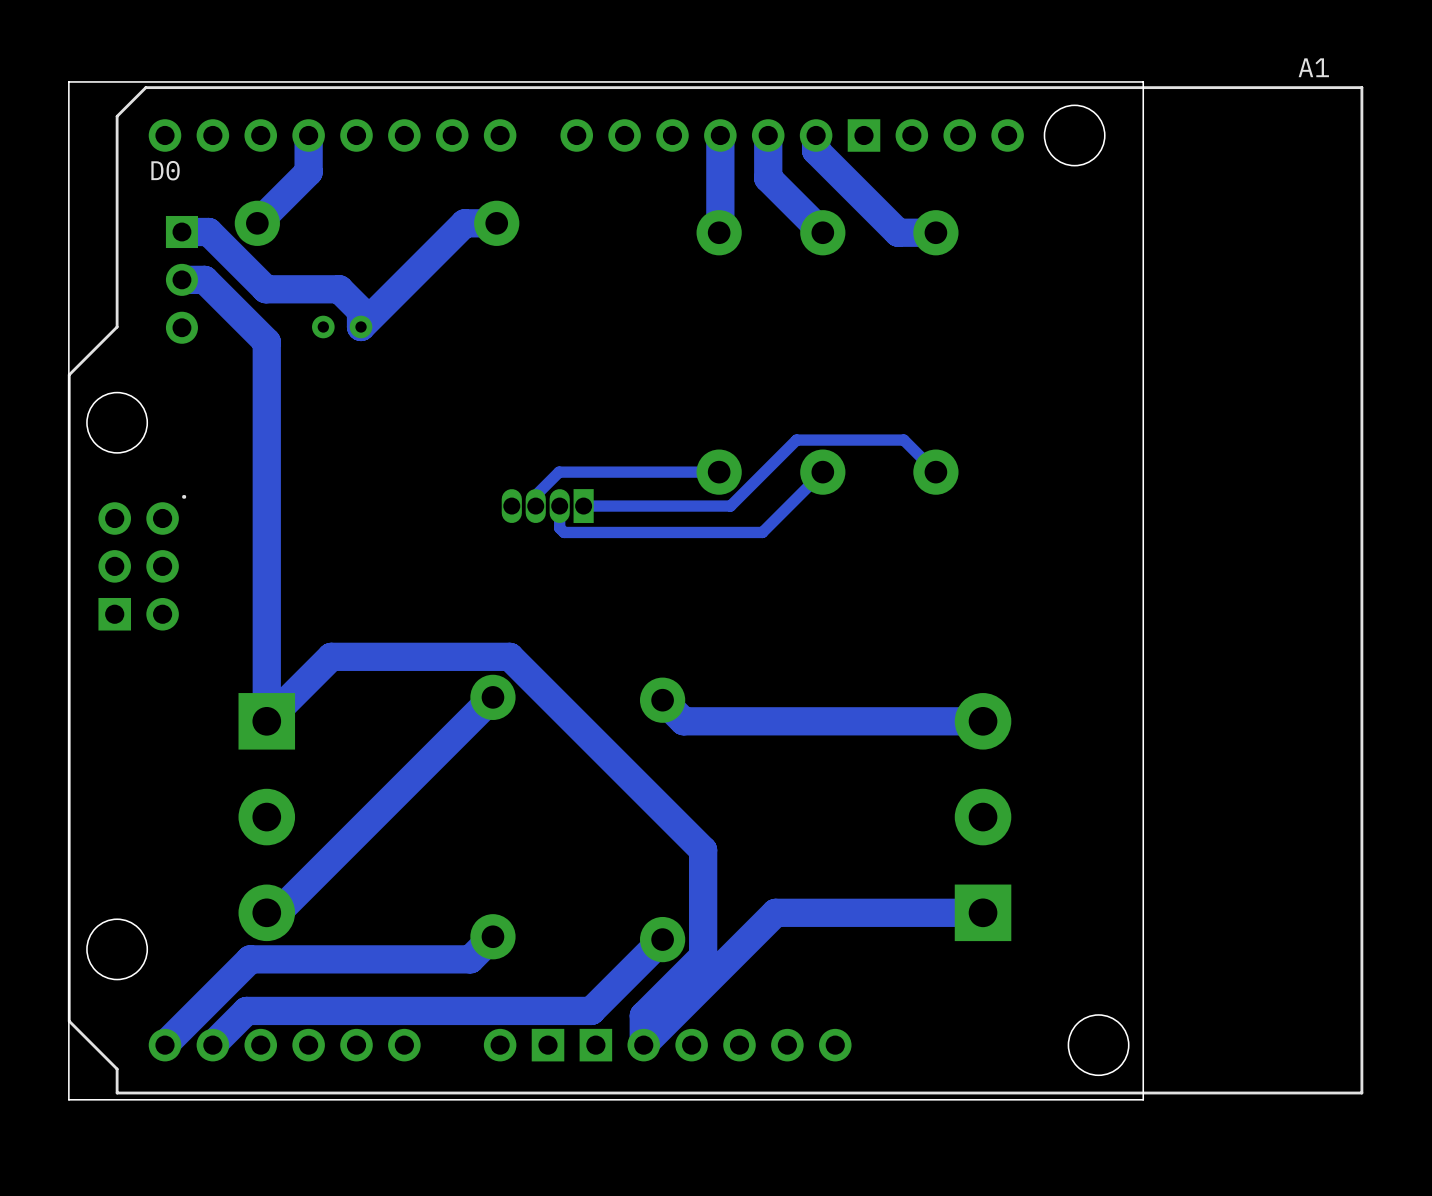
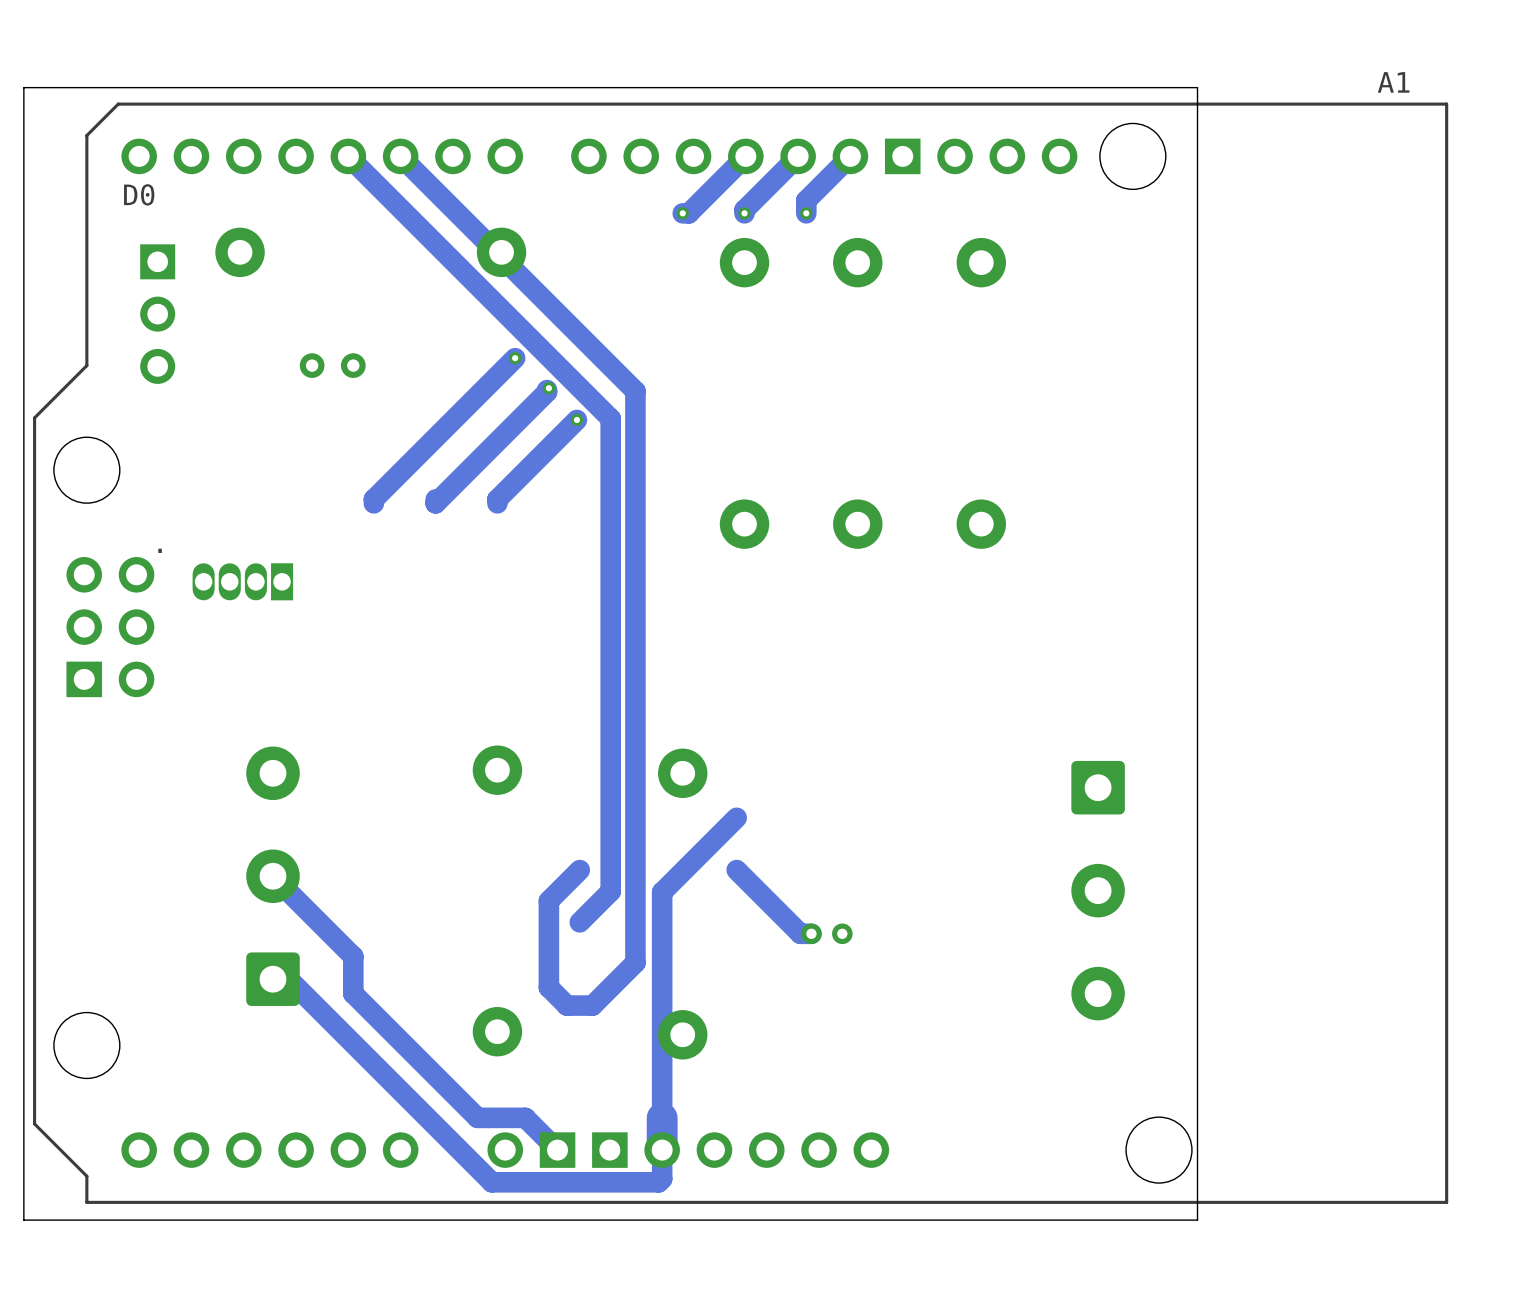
board edge: (1143, 81) (68, 81) (68, 1099) (1143, 1099) (1143, 81) -> (1197, 87) (1197, 1220) (23, 1220) (23, 87) (1197, 87)
track: (308, 135) (308, 172) (257, 223) -> none
track: none -> (348, 156) (610, 418) (610, 891) (579, 922)
track: none -> (400, 156) (635, 391) (635, 962) (592, 1005) (566, 1005) (548, 987) (548, 900) (579, 870)
track: (720, 135) (719, 232) -> (745, 156) (688, 213) (682, 213)
track: (768, 135) (768, 178) (822, 232) -> (798, 156) (744, 210) (744, 213)
track: (816, 135) (816, 150) (898, 232) (935, 232) -> (850, 156) (806, 200) (806, 213)
via: none -> (682, 213)
via: none -> (744, 213)
via: none -> (806, 213)
track: (496, 223) (464, 223) (361, 326) (361, 311) (339, 289) (265, 289) (208, 232) (181, 232) -> none
track: (181, 279) (204, 279) (266, 342) (266, 721) (331, 656) (509, 656) (703, 850) (703, 956) (643, 1015) -> (736, 817) (662, 892) (662, 1118)
track: none -> (515, 358) (373, 499) (373, 503)
via: none -> (515, 358)
via: none -> (548, 388)
track: none -> (547, 390) (435, 503) (435, 499)
track: none -> (576, 419) (497, 499) (497, 503)
via: none -> (576, 419)
track: (719, 472) (559, 472) (535, 495) (535, 506) -> none
track: (822, 472) (762, 532) (564, 532) (559, 528) (559, 506) -> none
track: (935, 472) (903, 440) (796, 440) (730, 506) (583, 506) -> none
part: (547, 506) -> none
part: none -> (242, 581)
track: (492, 697) (277, 912) (266, 912) -> none
track: (662, 700) (683, 721) (983, 721) -> none
track: none -> (736, 870) (800, 933) (811, 933)
track: none -> (273, 876) (353, 956) (353, 993) (477, 1117) (525, 1117) (557, 1150)
part: none -> (273, 876)
part: none -> (1098, 890)
part: (266, 817) -> none
part: (983, 817) -> none
part: none -> (826, 933)
track: (983, 912) (775, 912) (643, 1044) -> (273, 979) (288, 979) (491, 1182) (658, 1182) (662, 1178) (662, 1150)
track: (492, 936) (470, 959) (250, 959) (164, 1045) -> none
track: (662, 939) (591, 1010) (246, 1010) (212, 1045) -> none

